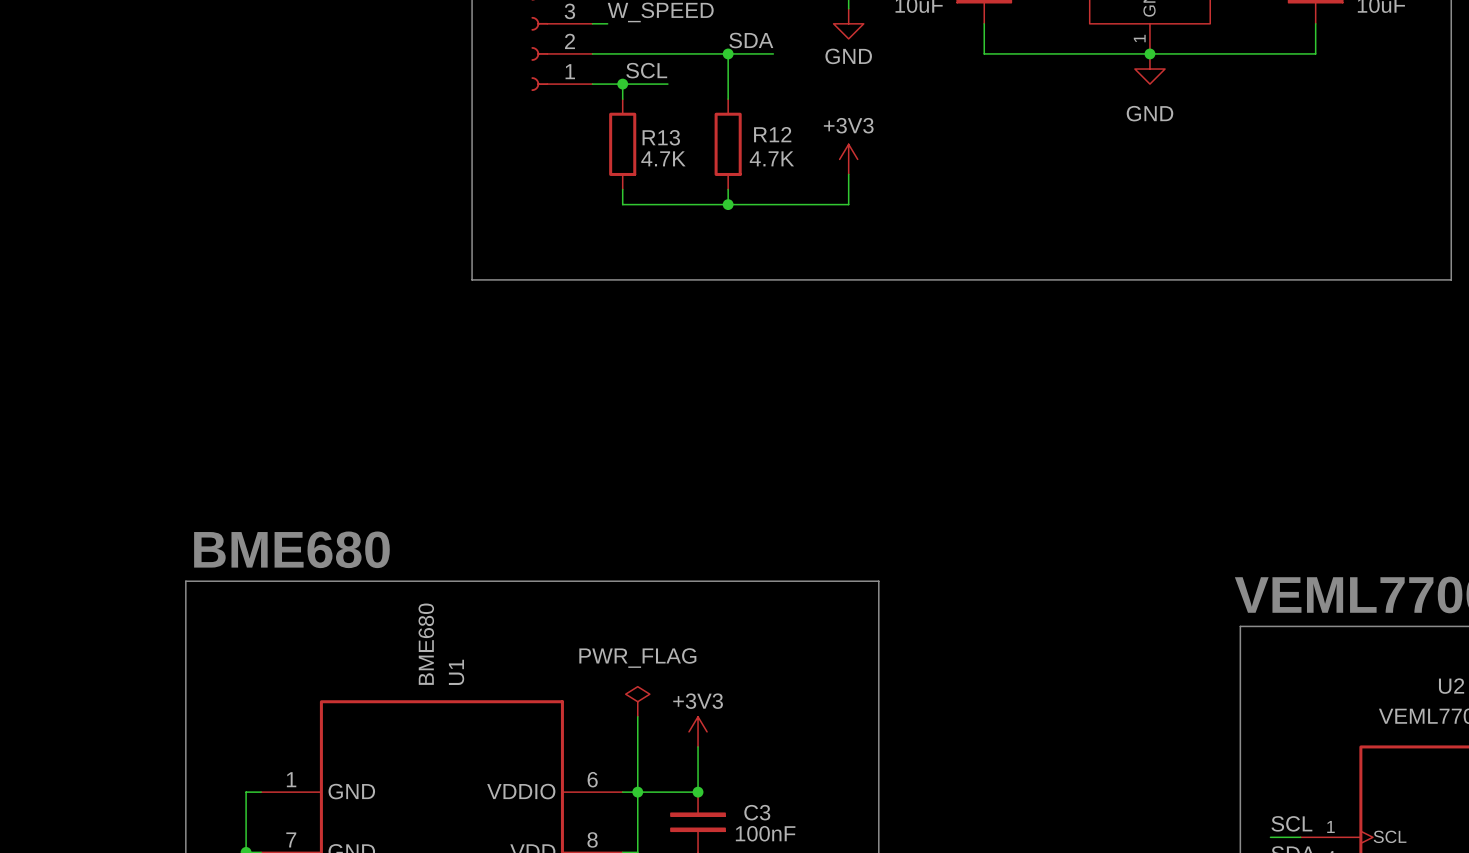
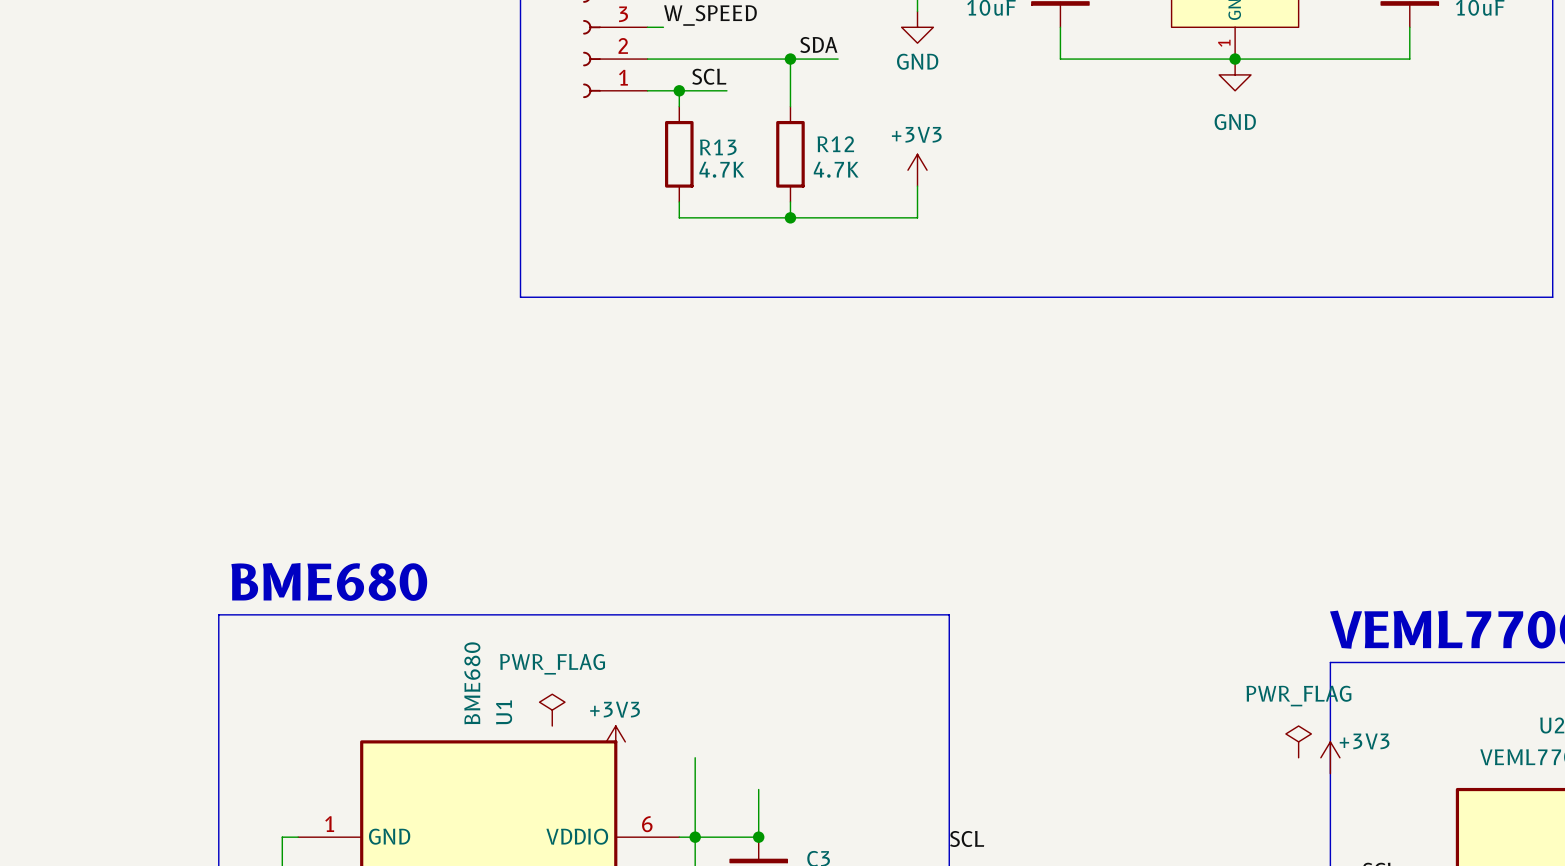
power symbol position: PWR_FLAG (637, 701) -> PWR_FLAG (552, 710)
power symbol: none -> PWR_FLAG (1298, 741)
power symbol: none -> +3V3 (1330, 757)
power symbol position: +3V3 (698, 731) -> +3V3 (615, 741)
label: none -> SCL (967, 838)

